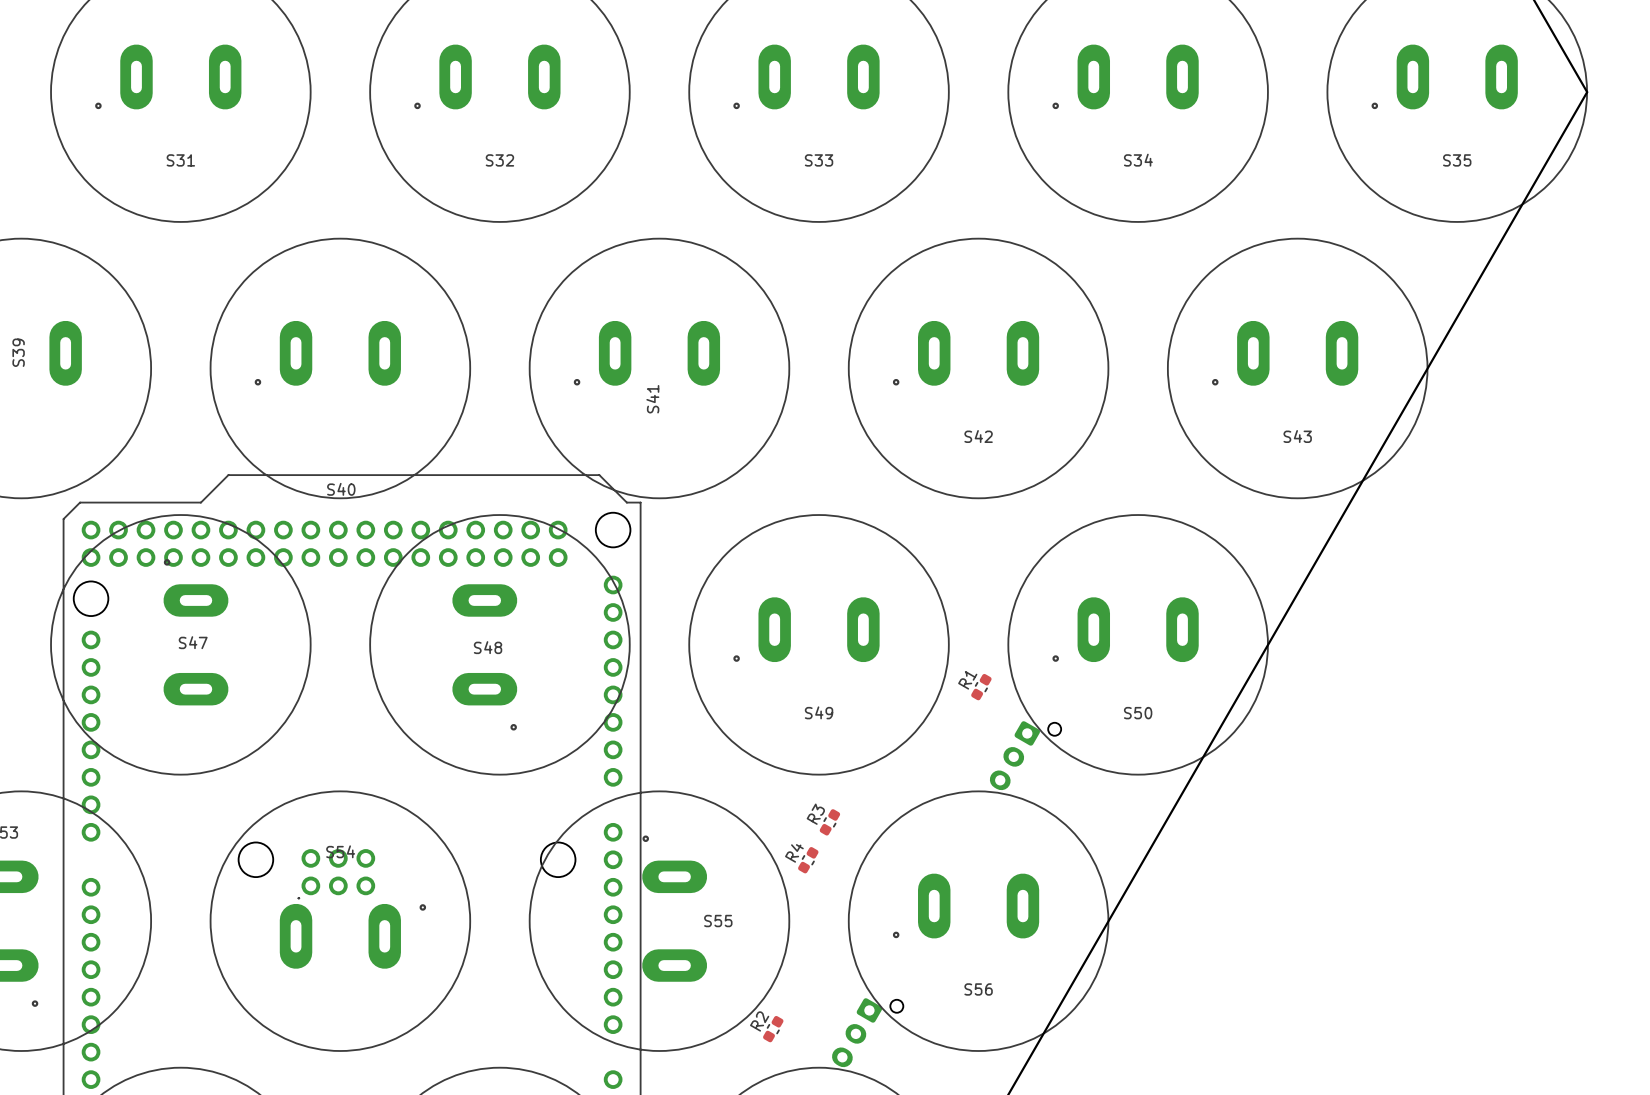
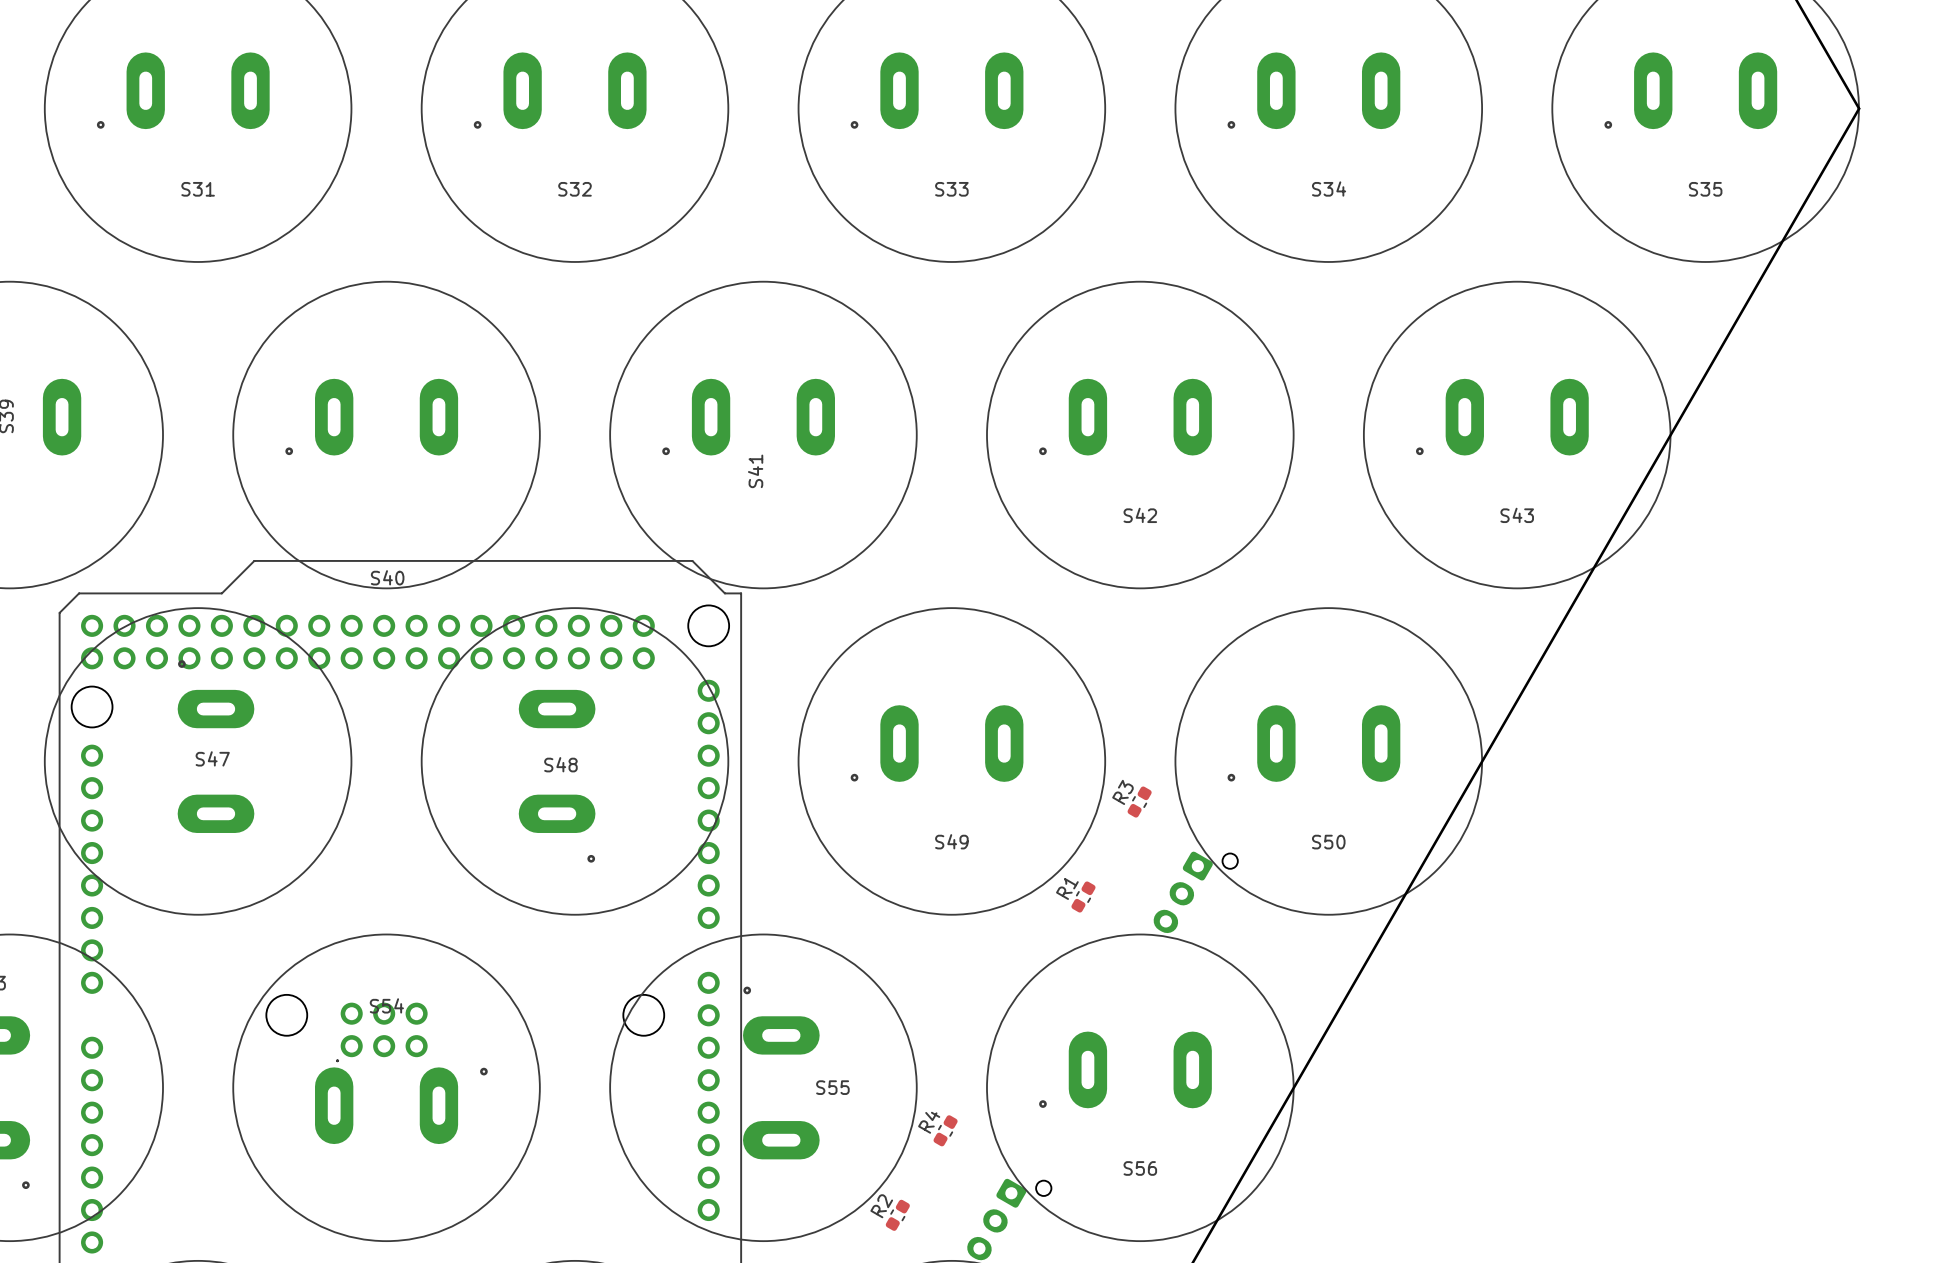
R1 position: (981, 687) -> (1083, 897)
R3 position: (829, 822) -> (1139, 802)
R4 position: (808, 860) -> (945, 1130)

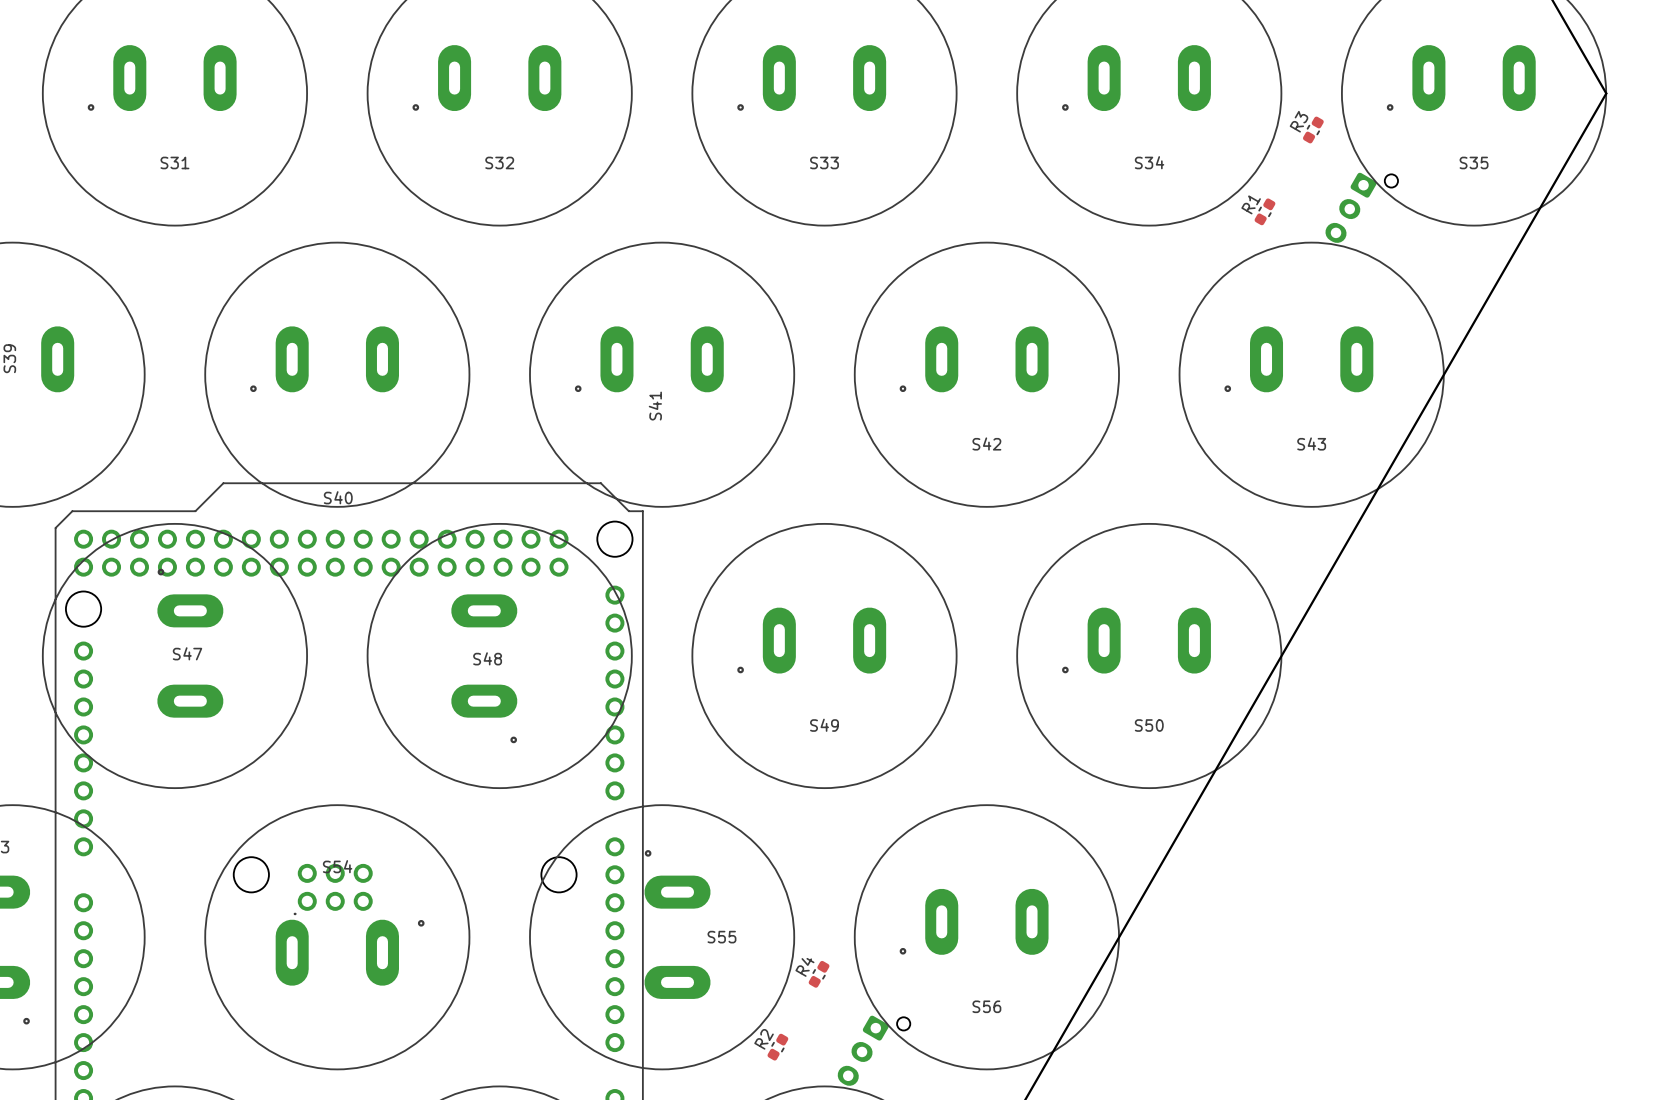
part: none -> (1361, 207)
R3 position: (1139, 802) -> (1313, 130)
part: (1195, 892) -> none
R1 position: (1083, 897) -> (1264, 211)

